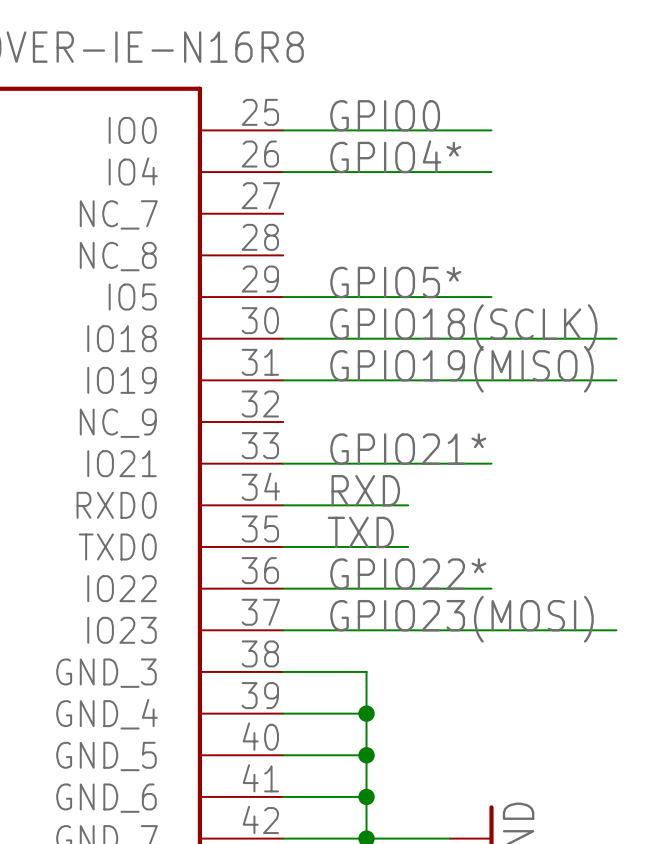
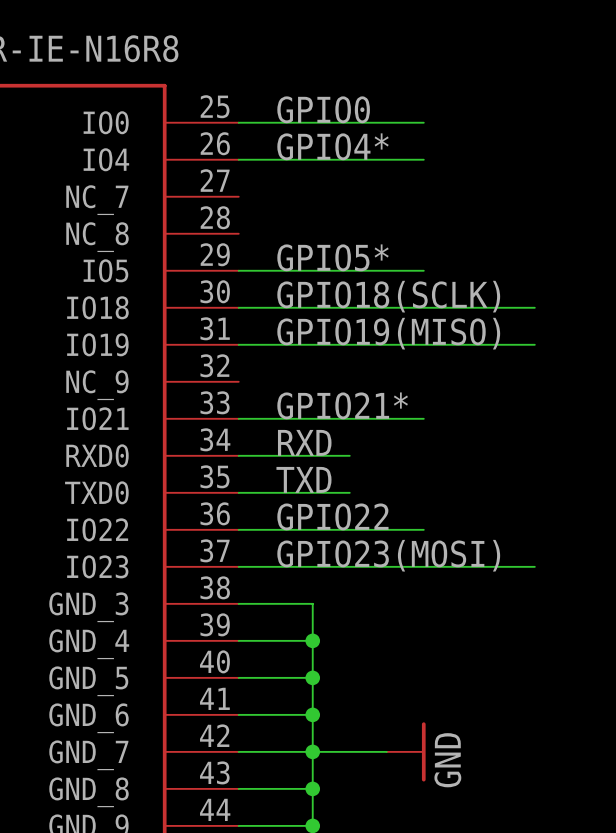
label: GPIO22* (408, 574) -> GPIO22 (332, 516)

